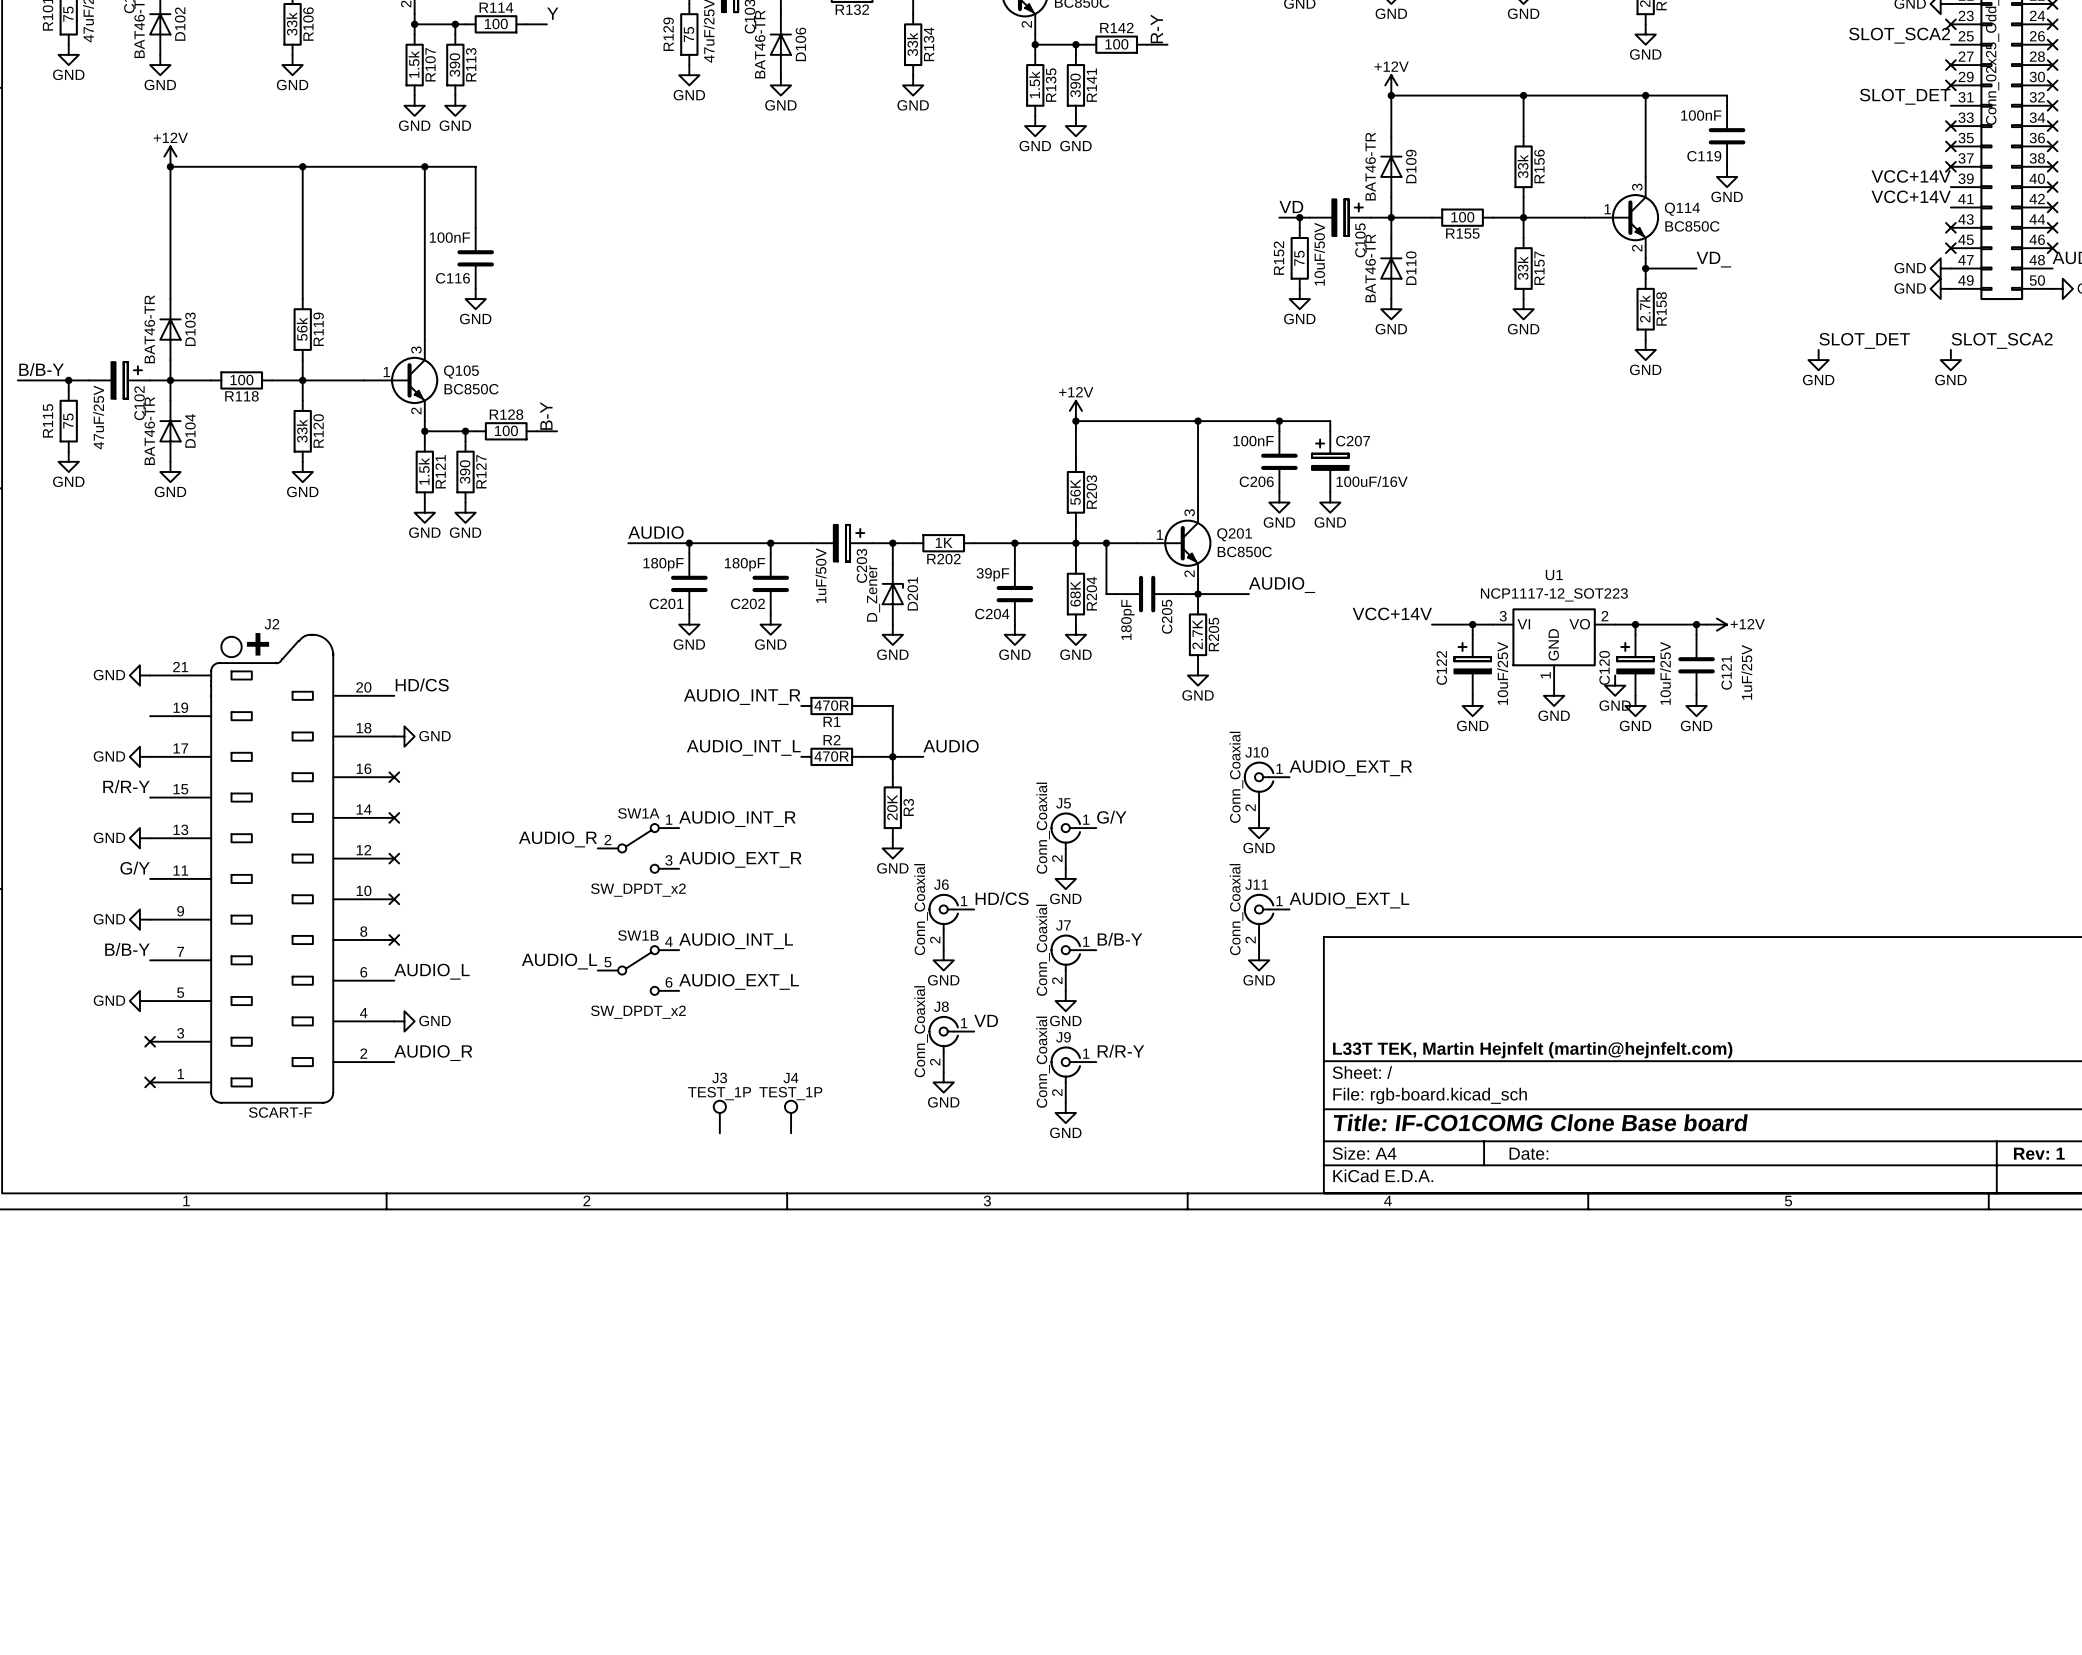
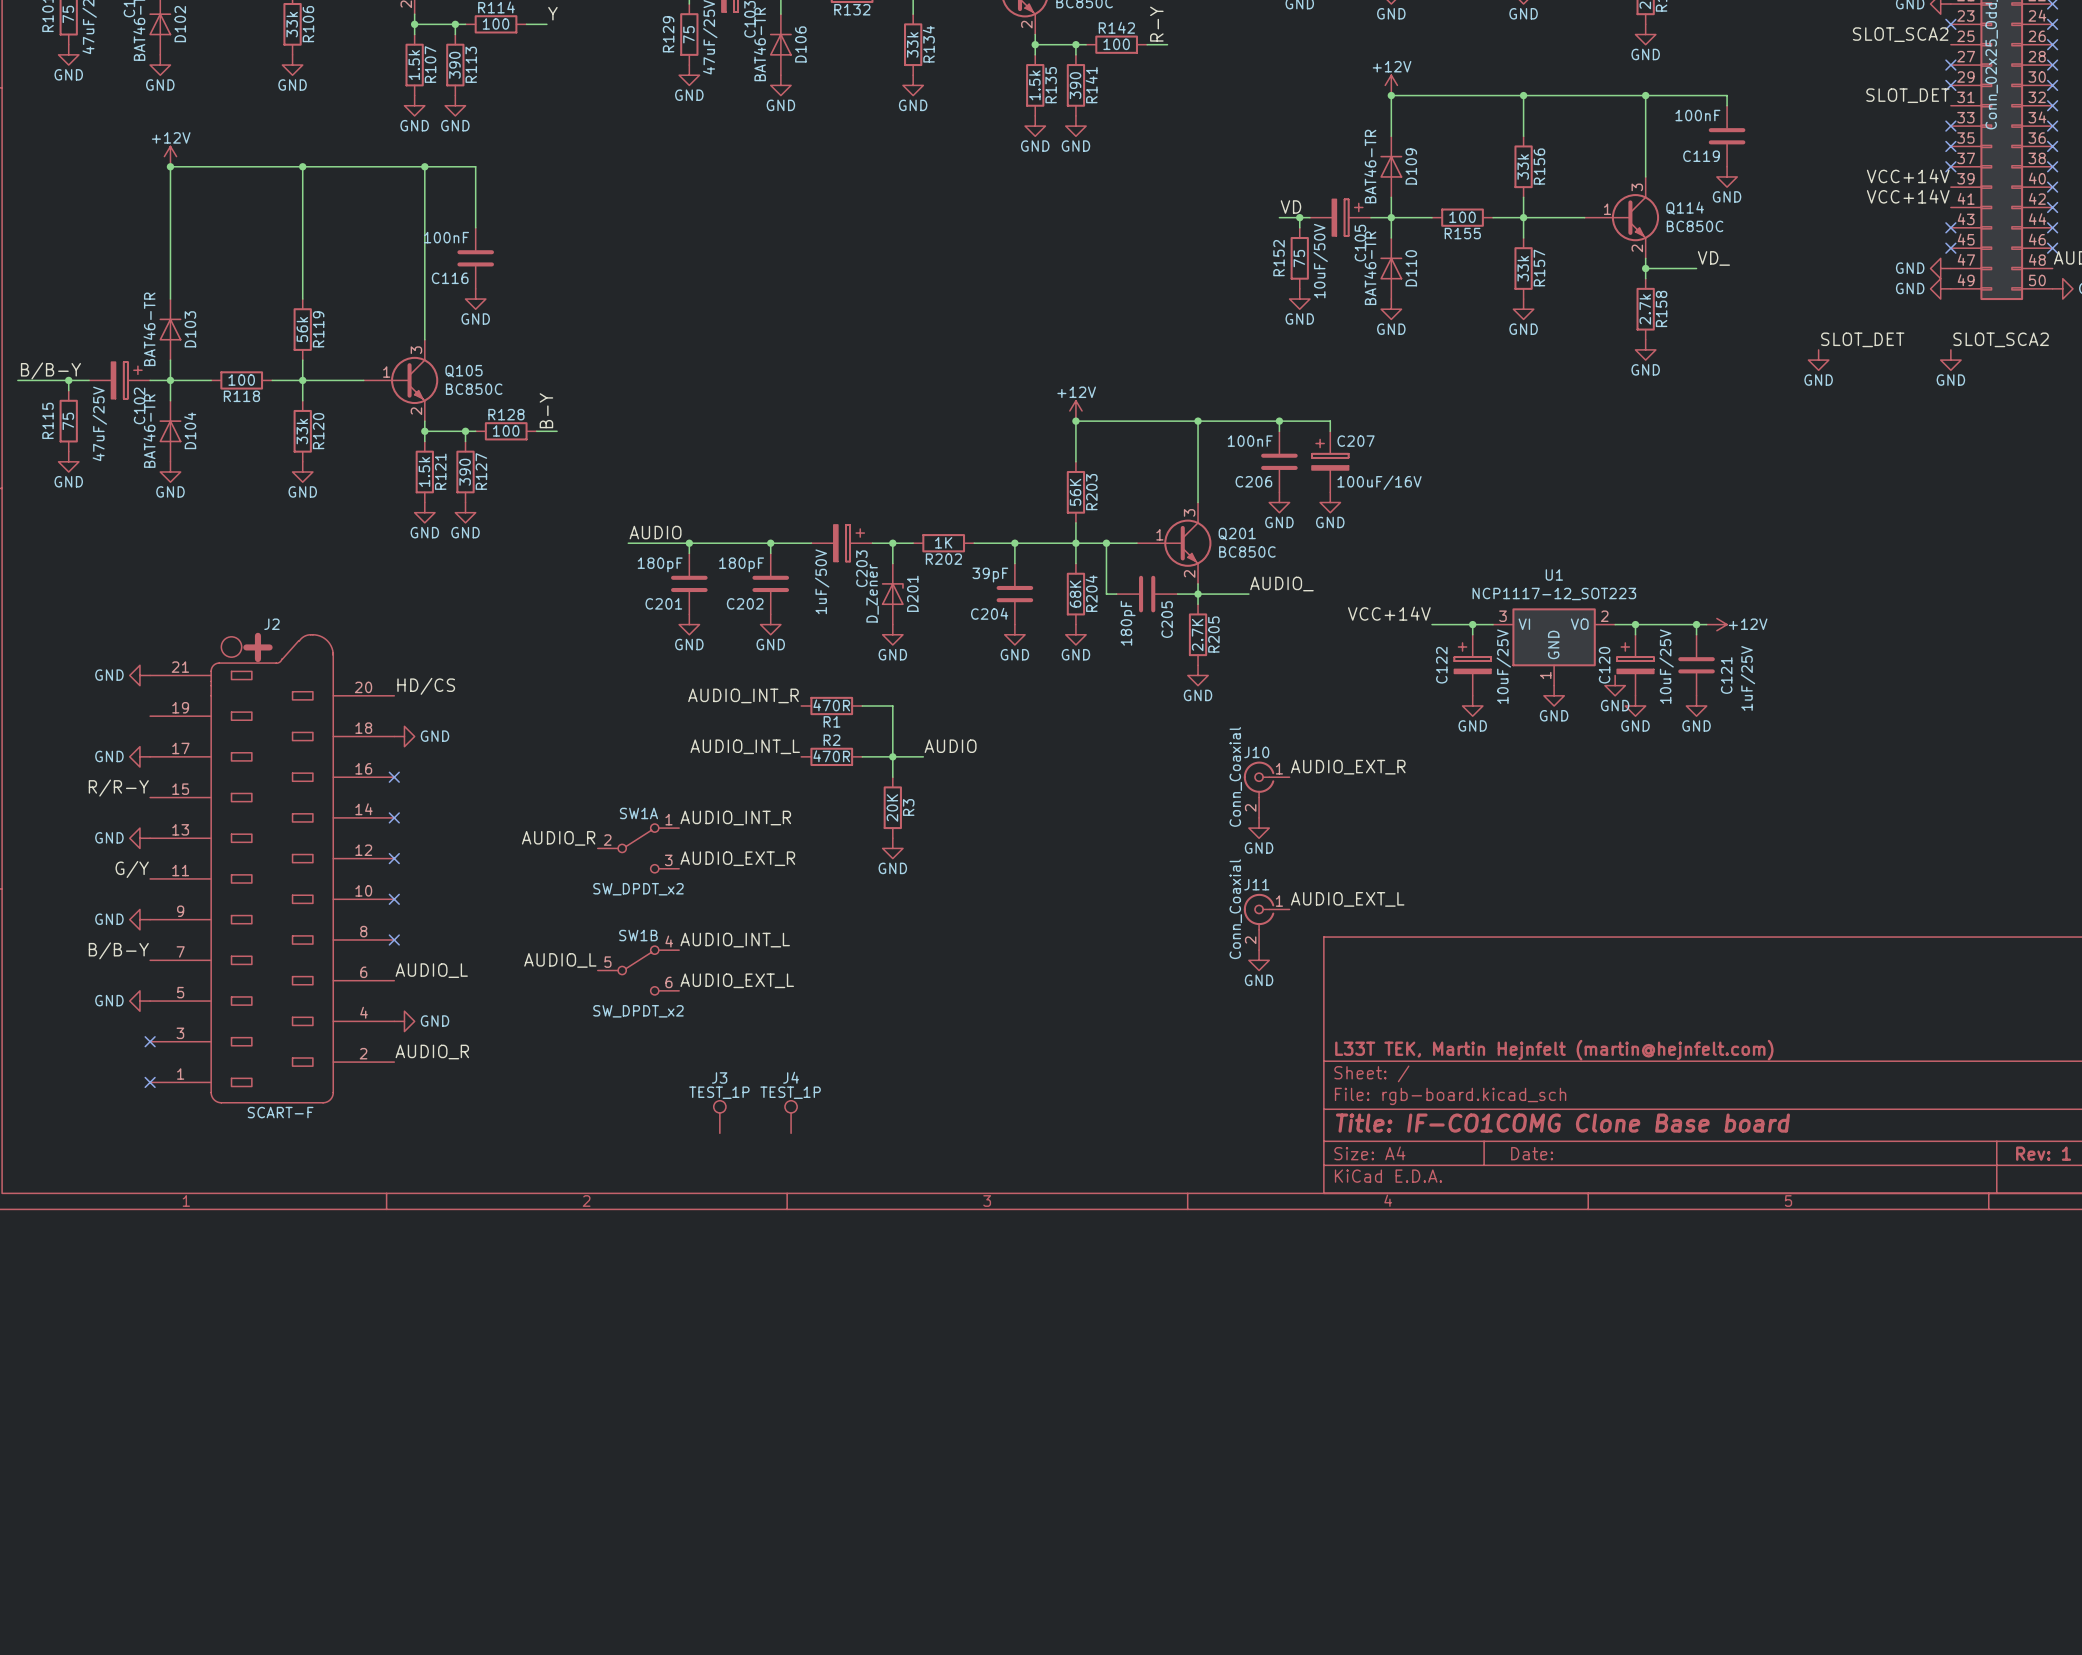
label: G/Y (1111, 817) -> none
J5: Conn_Coaxial (1073, 840) -> none
power symbol: GND (1065, 878) -> none
label: HD/CS (1002, 898) -> none
J6: Conn_Coaxial (951, 921) -> none
label: B/B-Y (1119, 939) -> none
power symbol: GND (943, 960) -> none
J7: Conn_Coaxial (1073, 962) -> none
power symbol: GND (1065, 1001) -> none
label: VD (986, 1020) -> none
J8: Conn_Coaxial (951, 1044) -> none
label: R/R-Y (1120, 1051) -> none
J9: Conn_Coaxial (1073, 1074) -> none
power symbol: GND (943, 1082) -> none
power symbol: GND (1065, 1112) -> none

